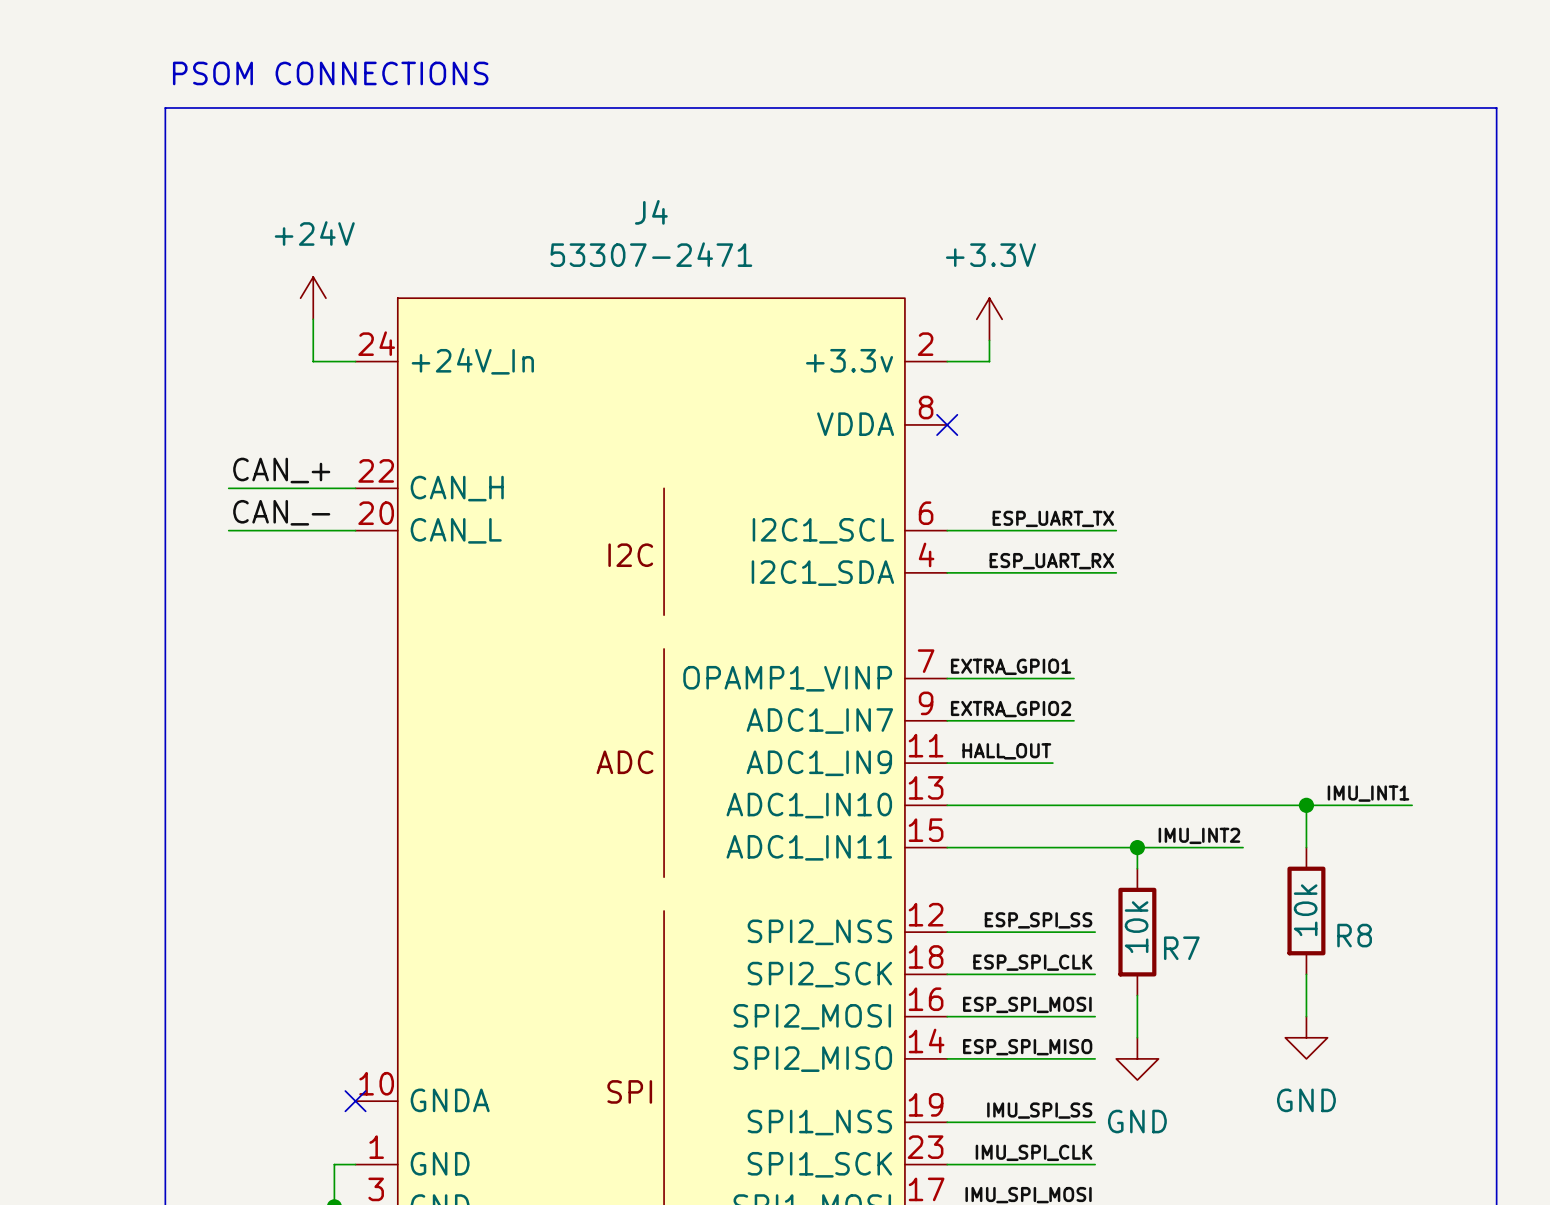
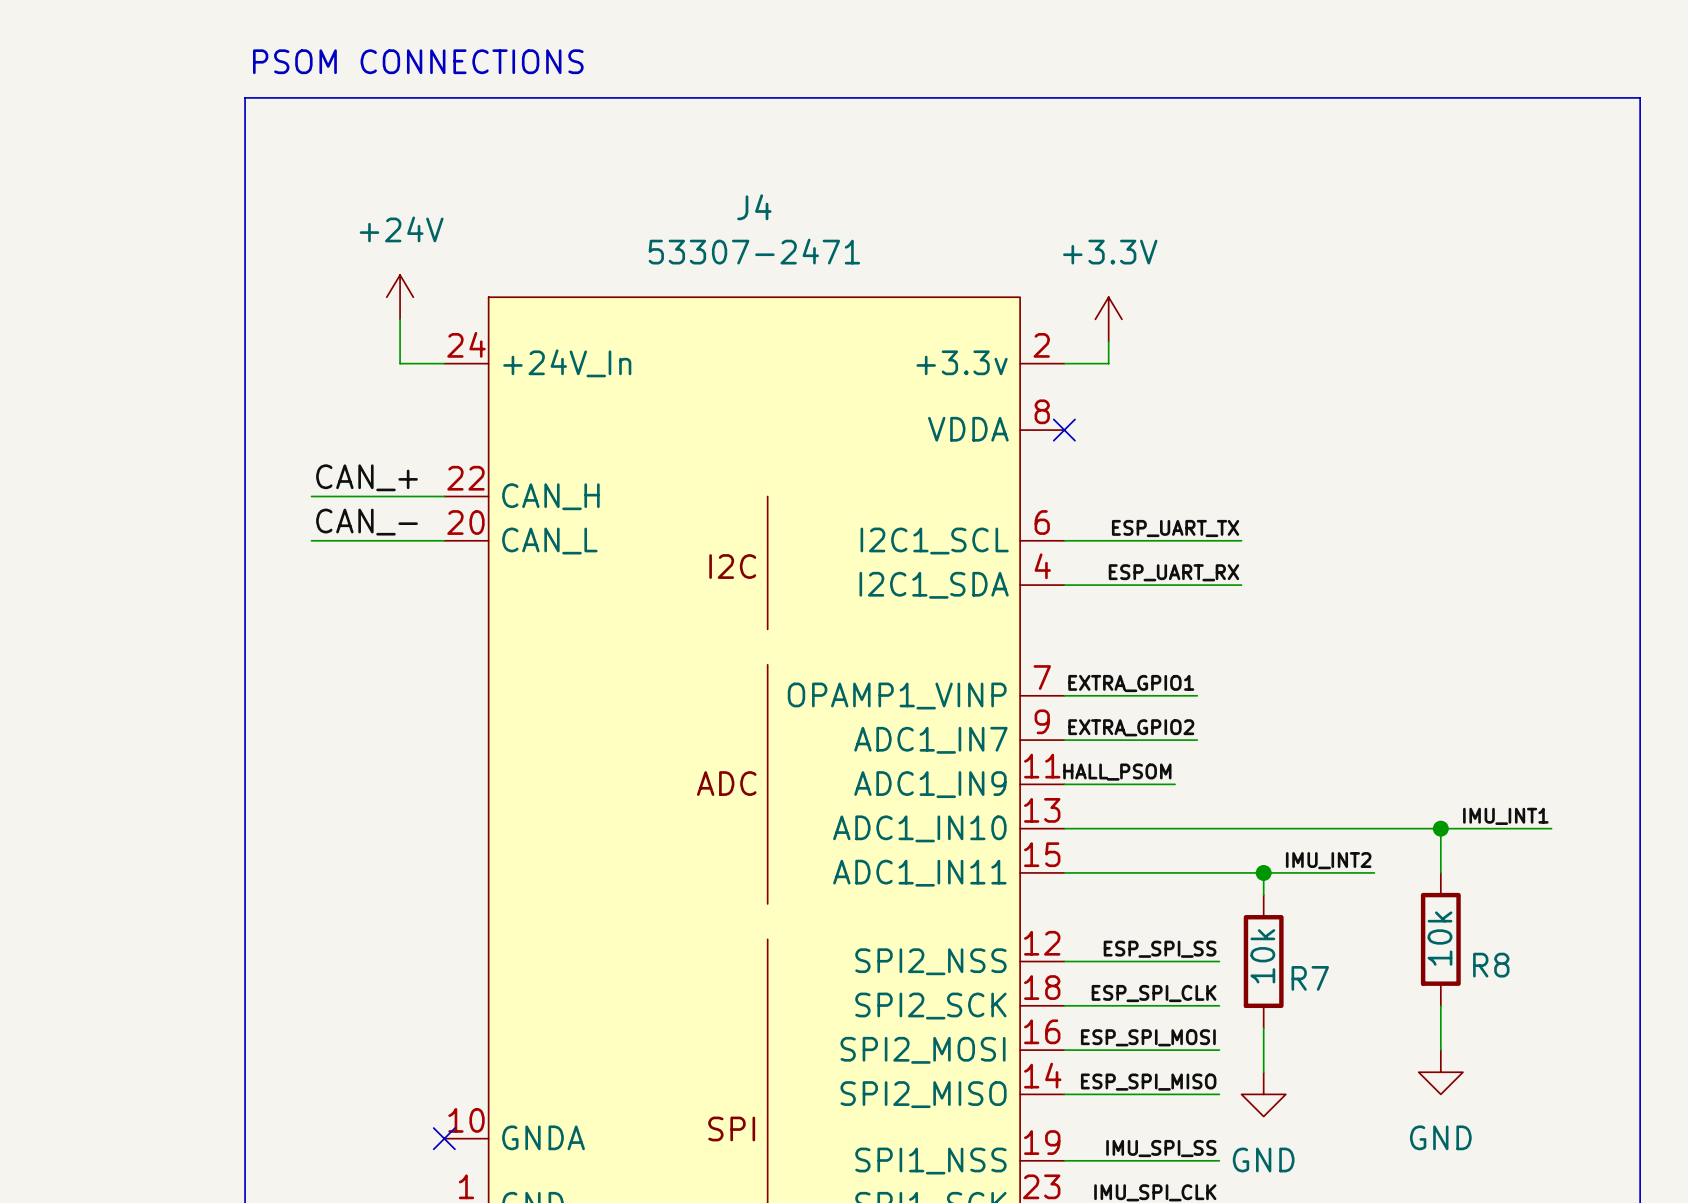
label: HALL_OUT (1006, 751) -> HALL_PSOM (1117, 772)

